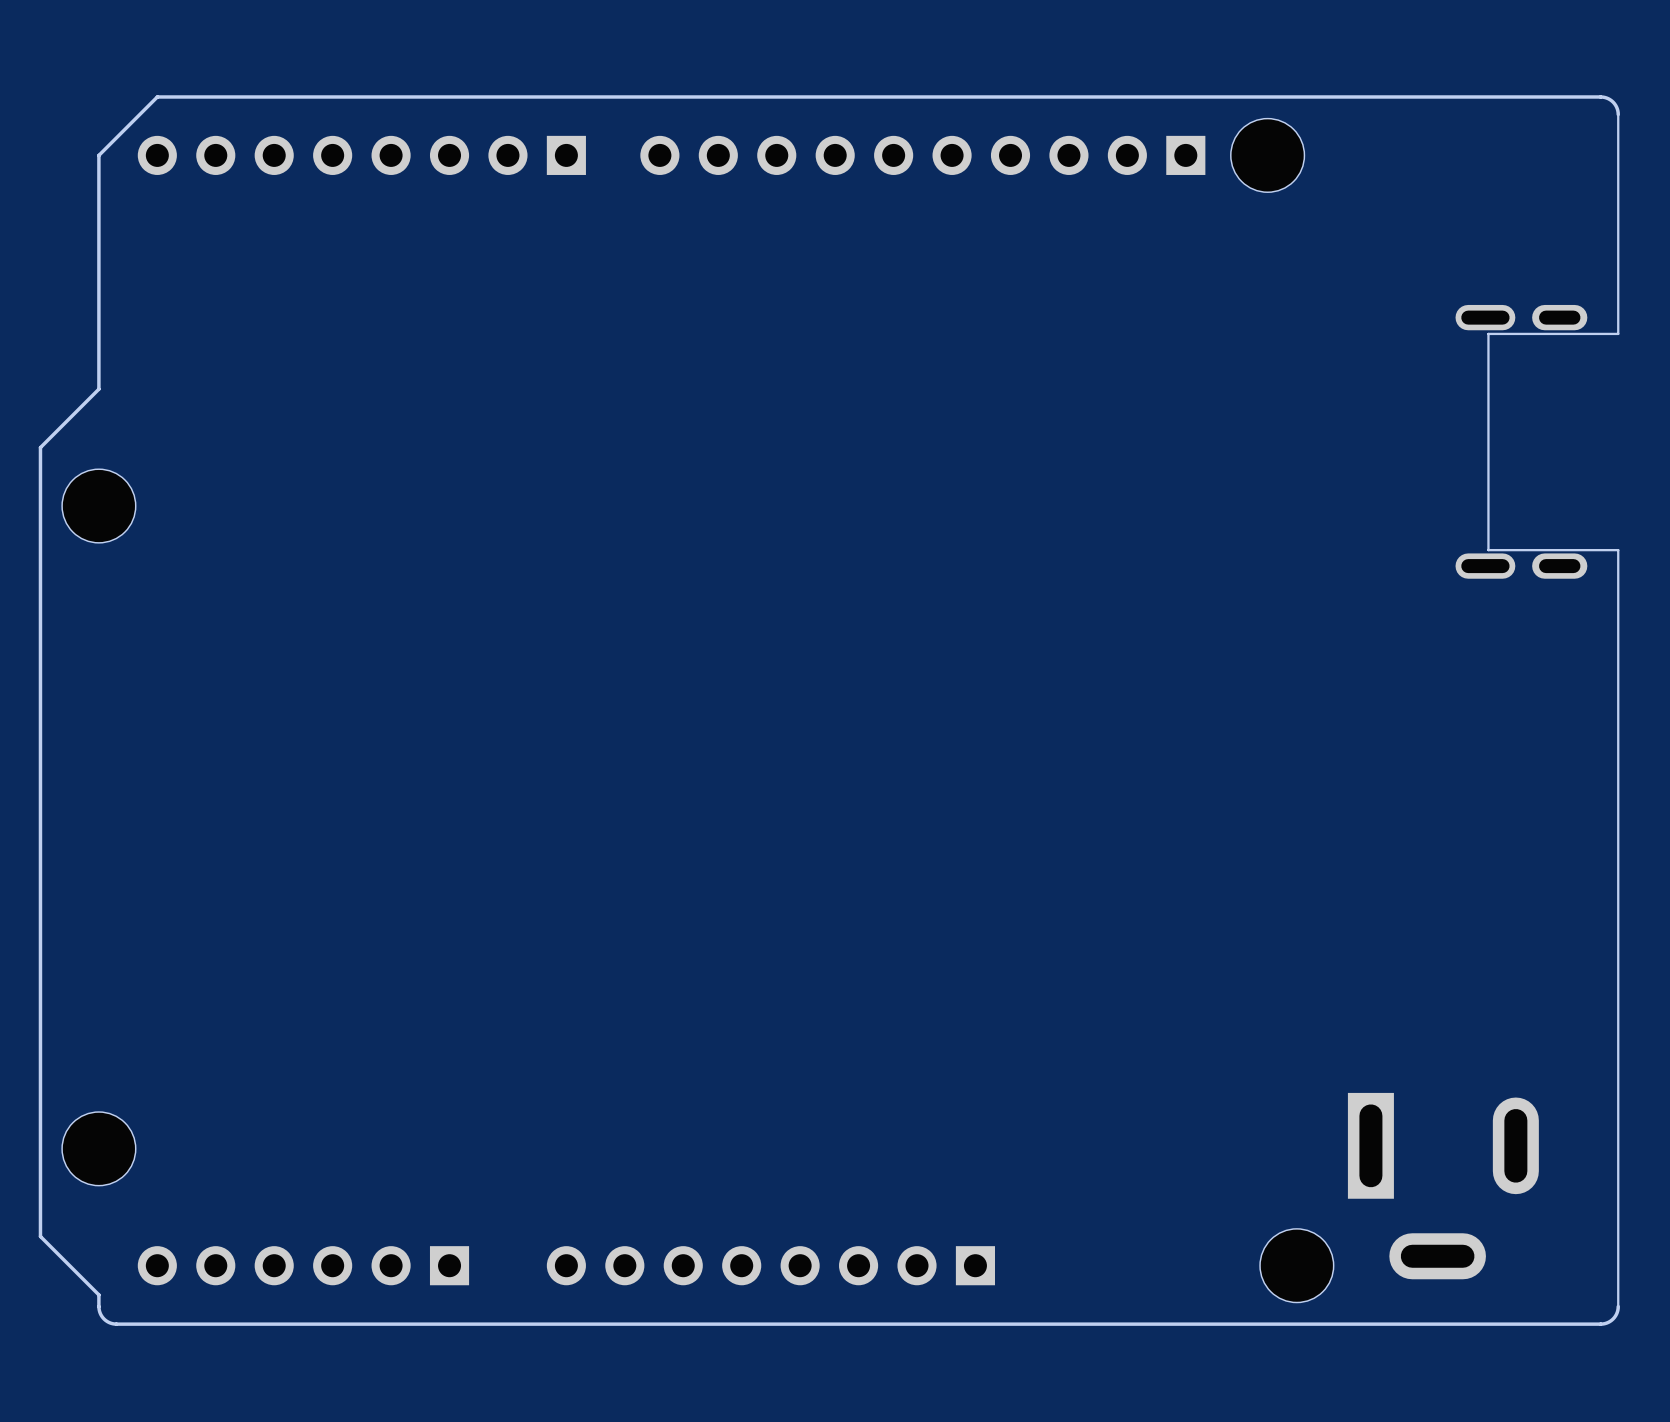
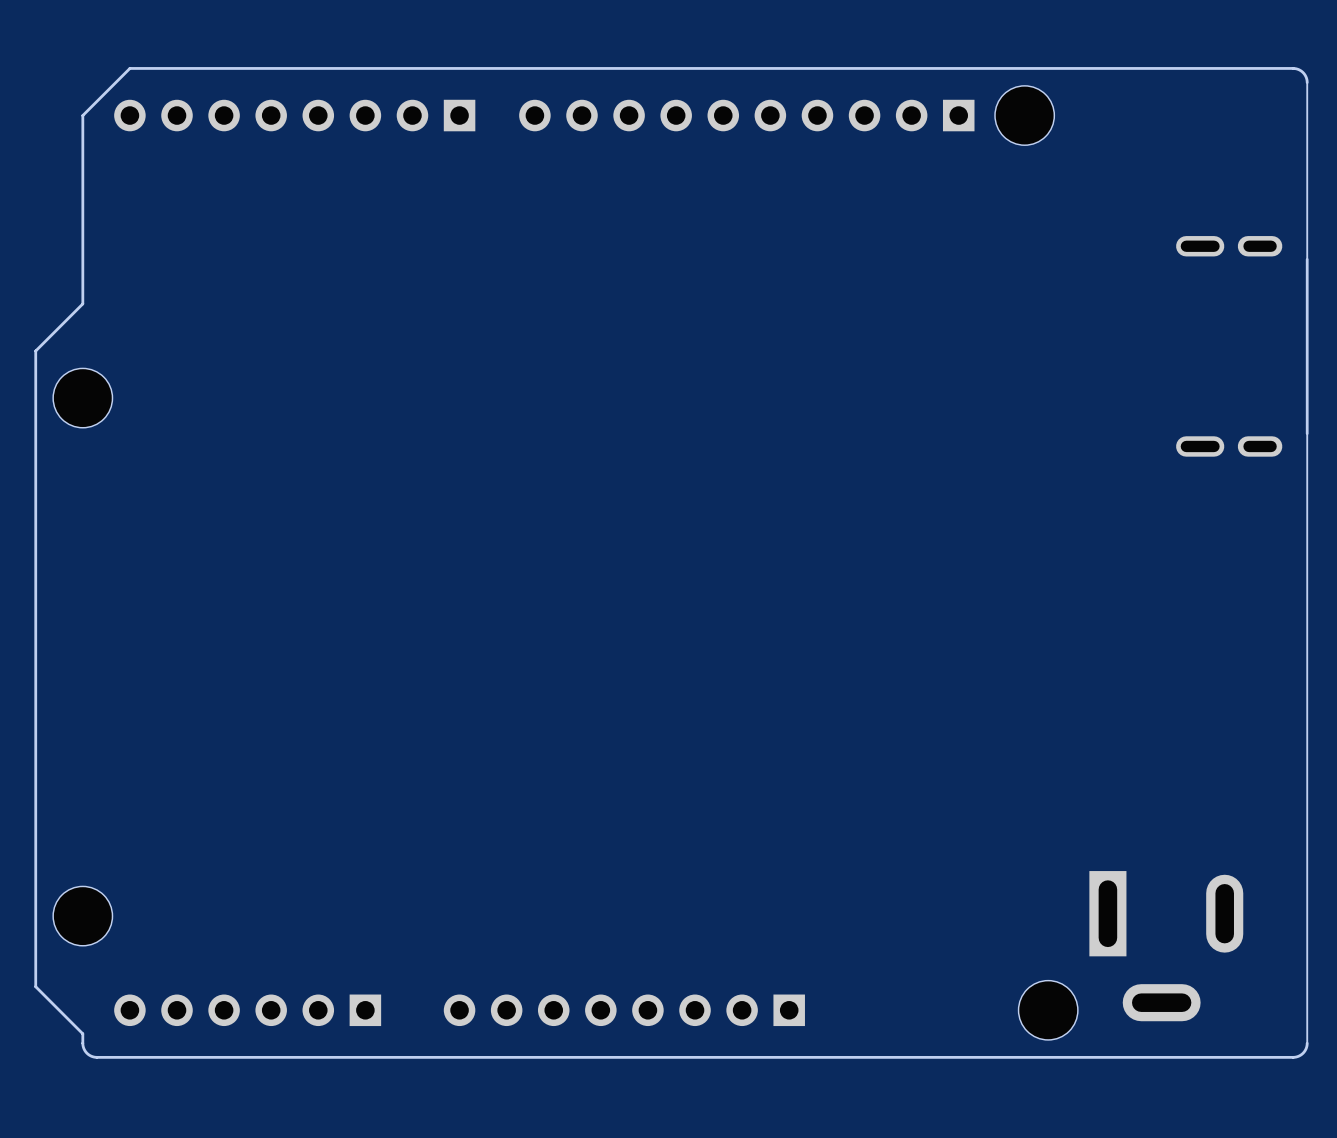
board edge: (1618, 333) (1488, 333) (1488, 550) (1618, 550) -> (1307, 259) (1307, 433)

